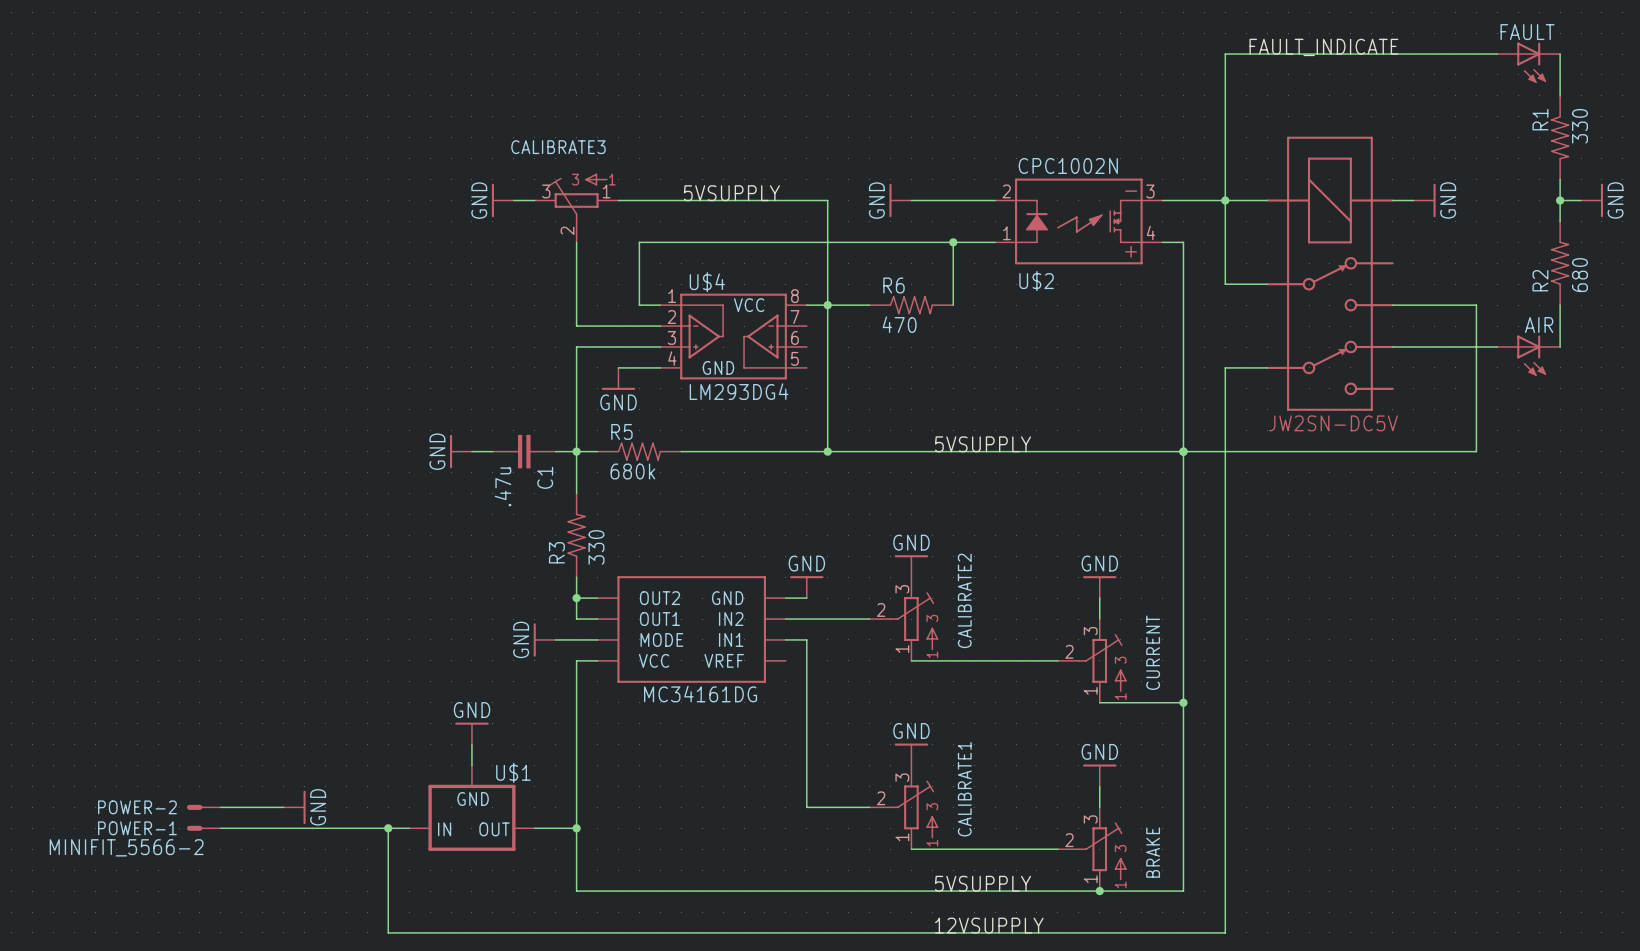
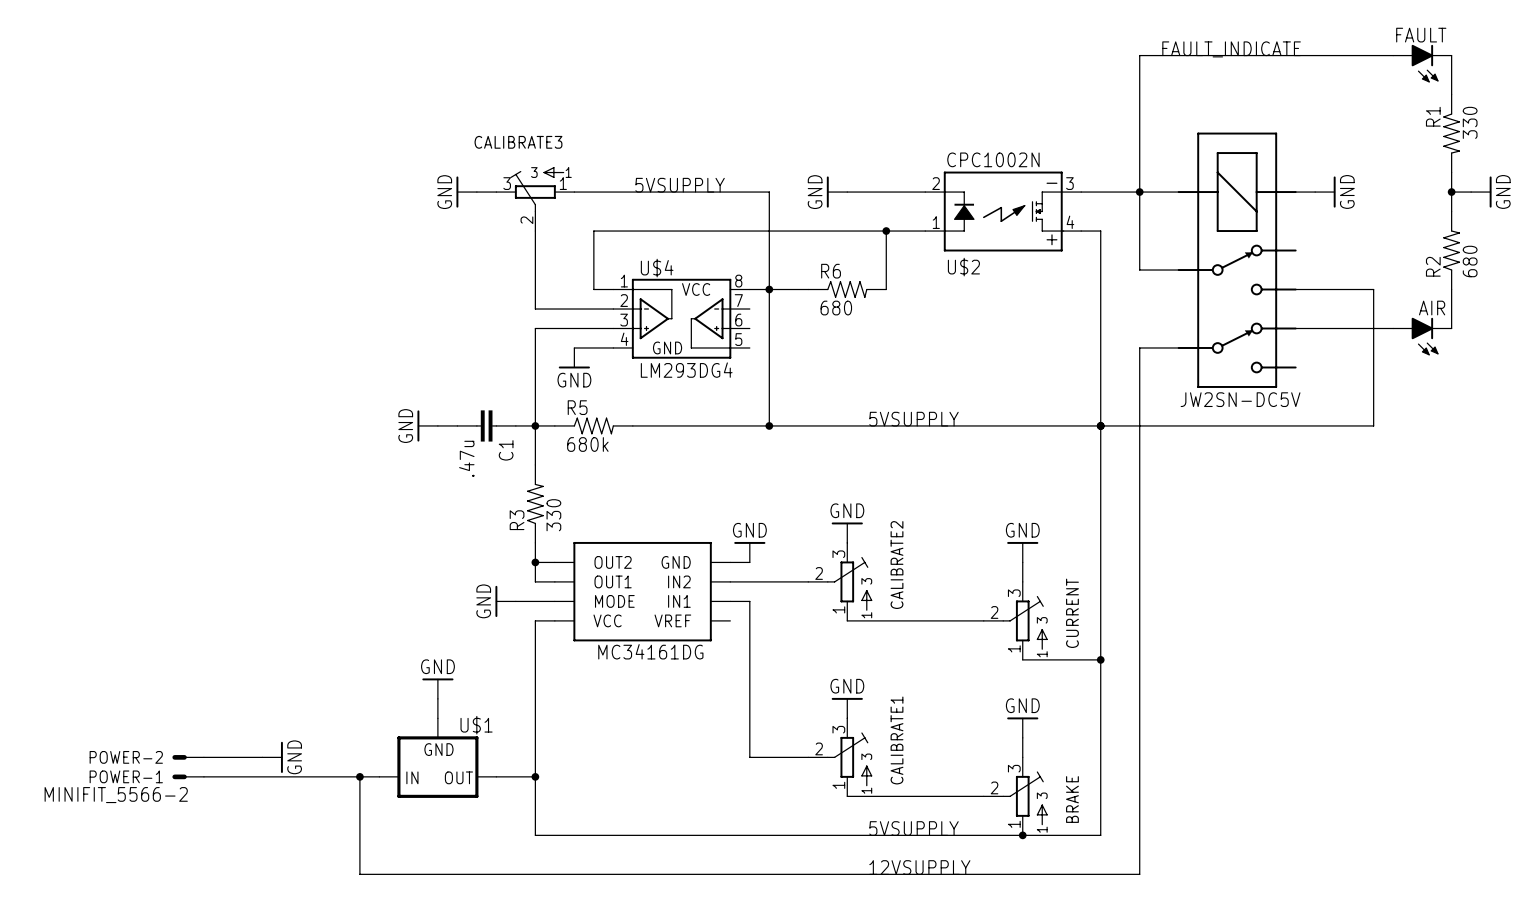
FAULT symbol: [1497, 42, 1561, 83] -> [1393, 44, 1452, 83]
R6 value: 470 (899, 324) -> 680 (836, 308)
AIR symbol: [1497, 335, 1561, 376] -> [1393, 317, 1452, 356]

